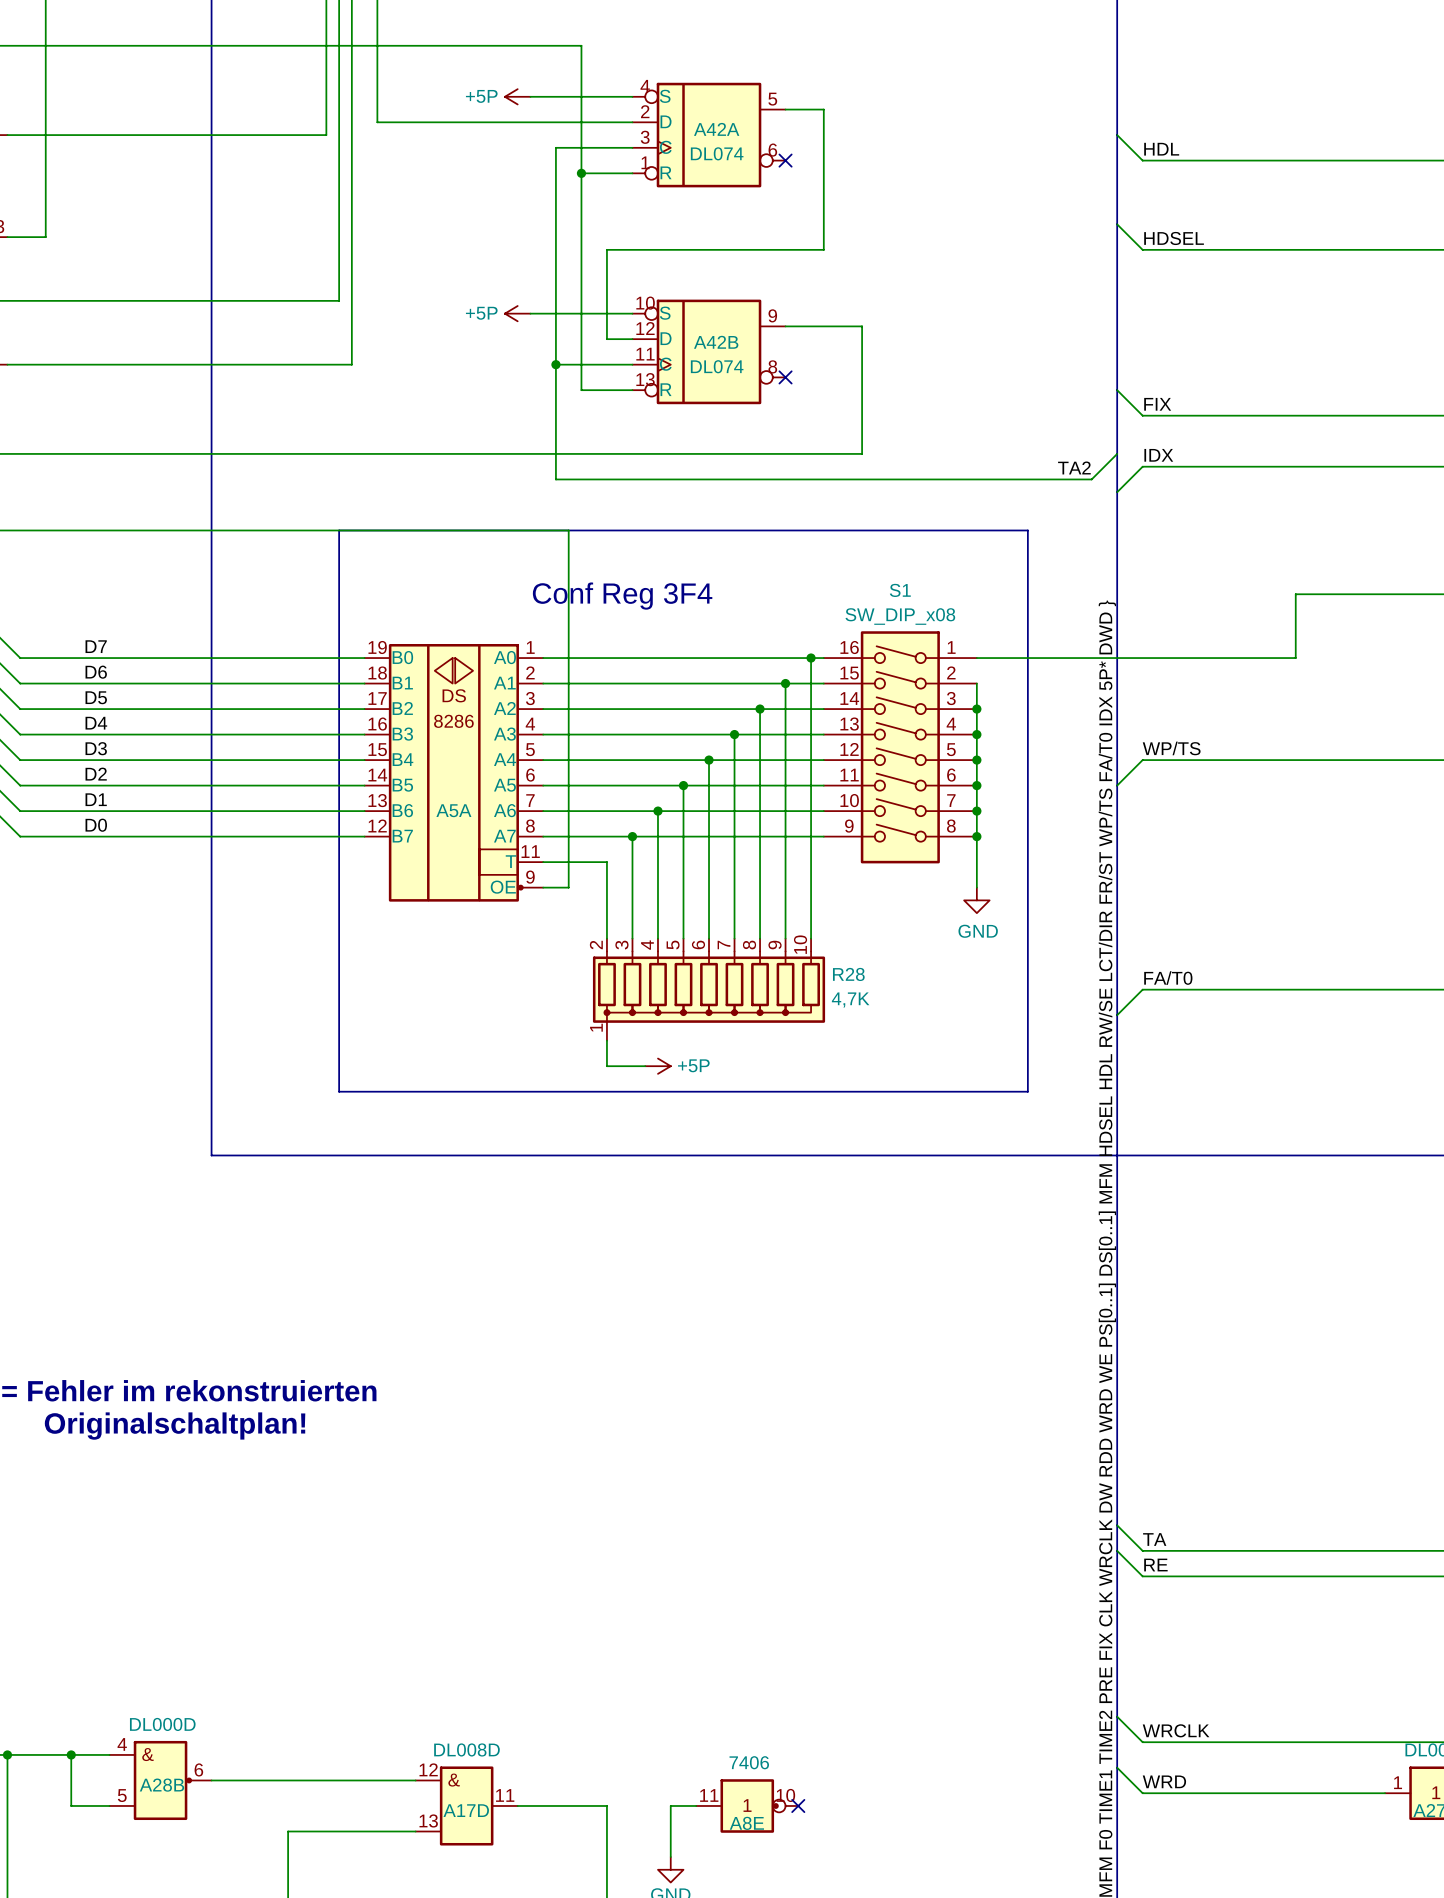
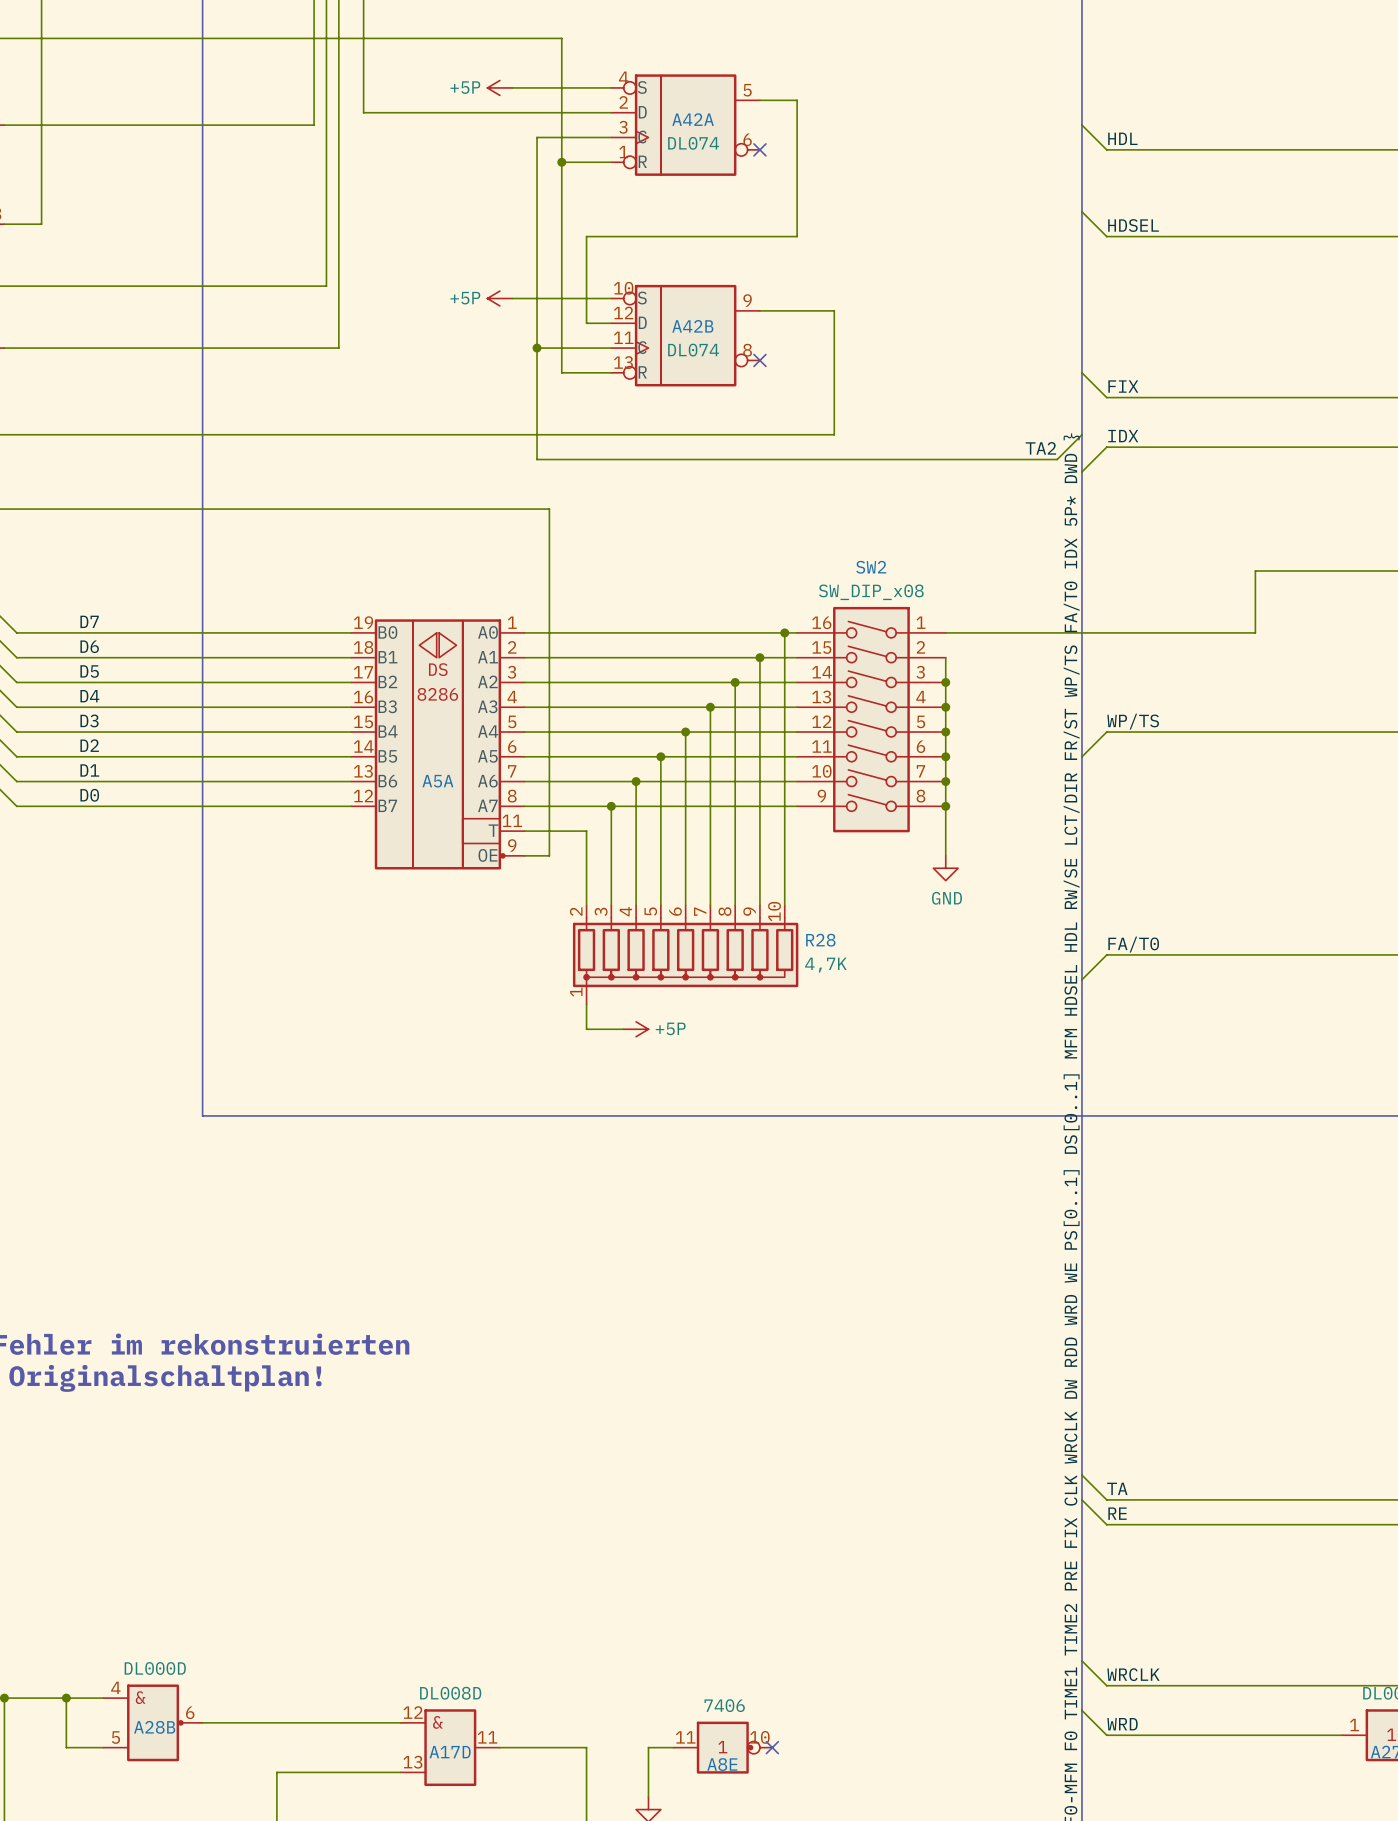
line: (339, 530) (1027, 530) (1027, 1091) (339, 1091) (339, 530) -> none
S1 name: S1 (900, 590) -> SW2 (871, 567)
text: Conf Reg 3F4 (622, 596) -> none

